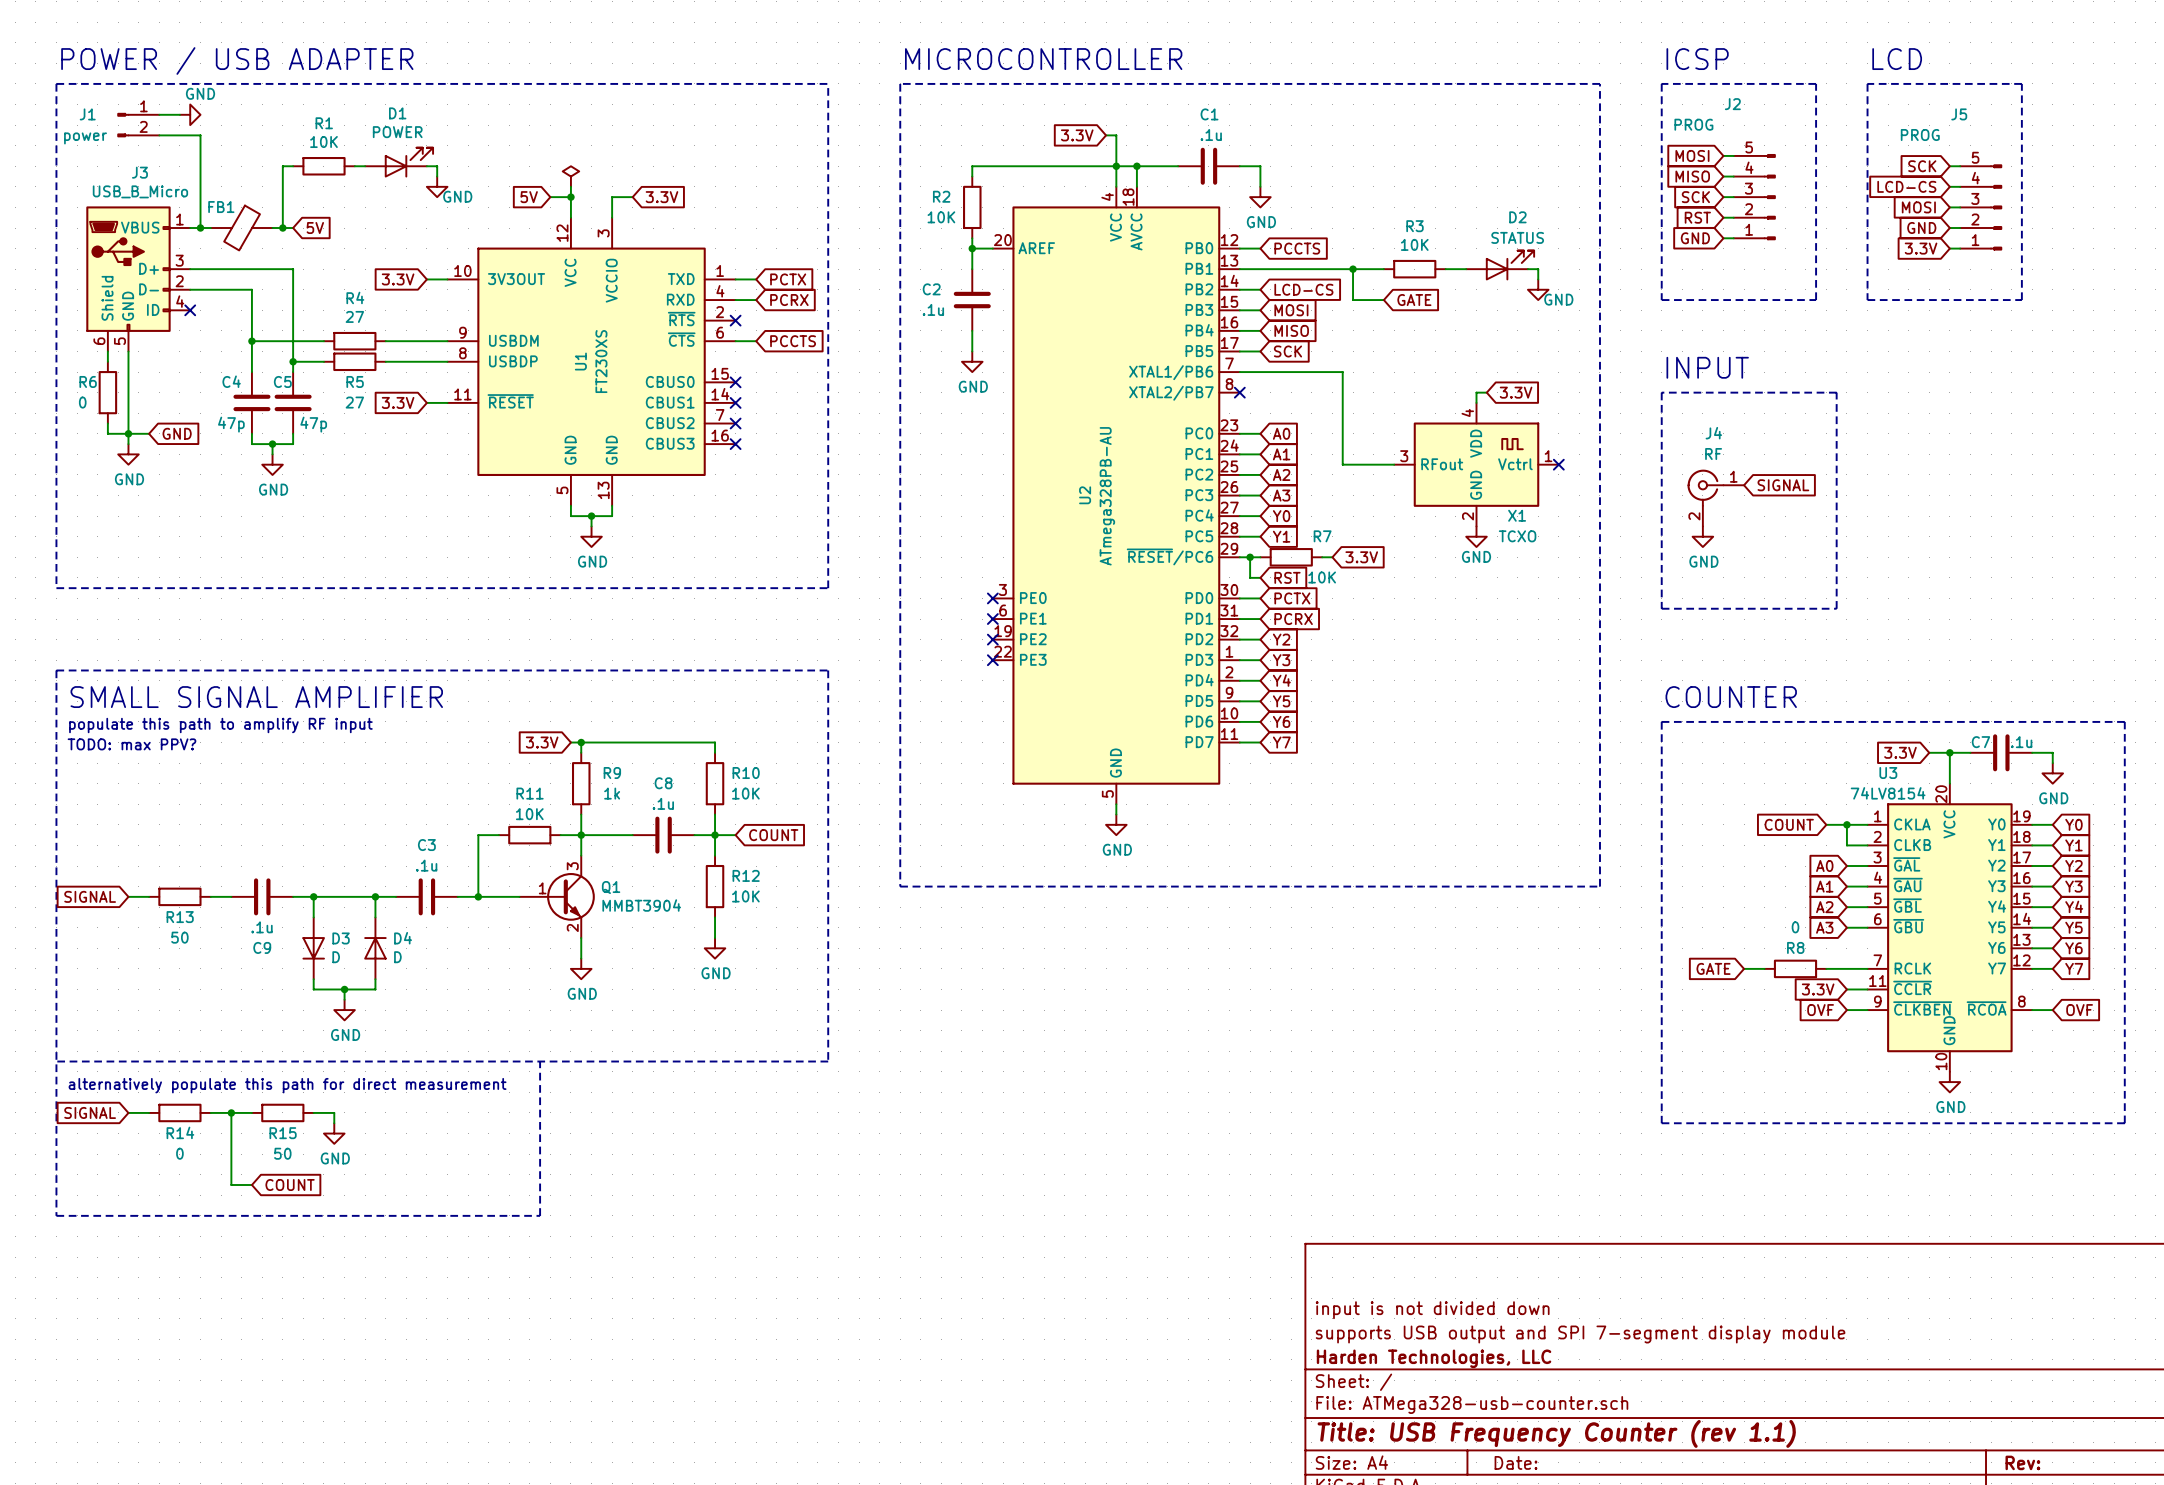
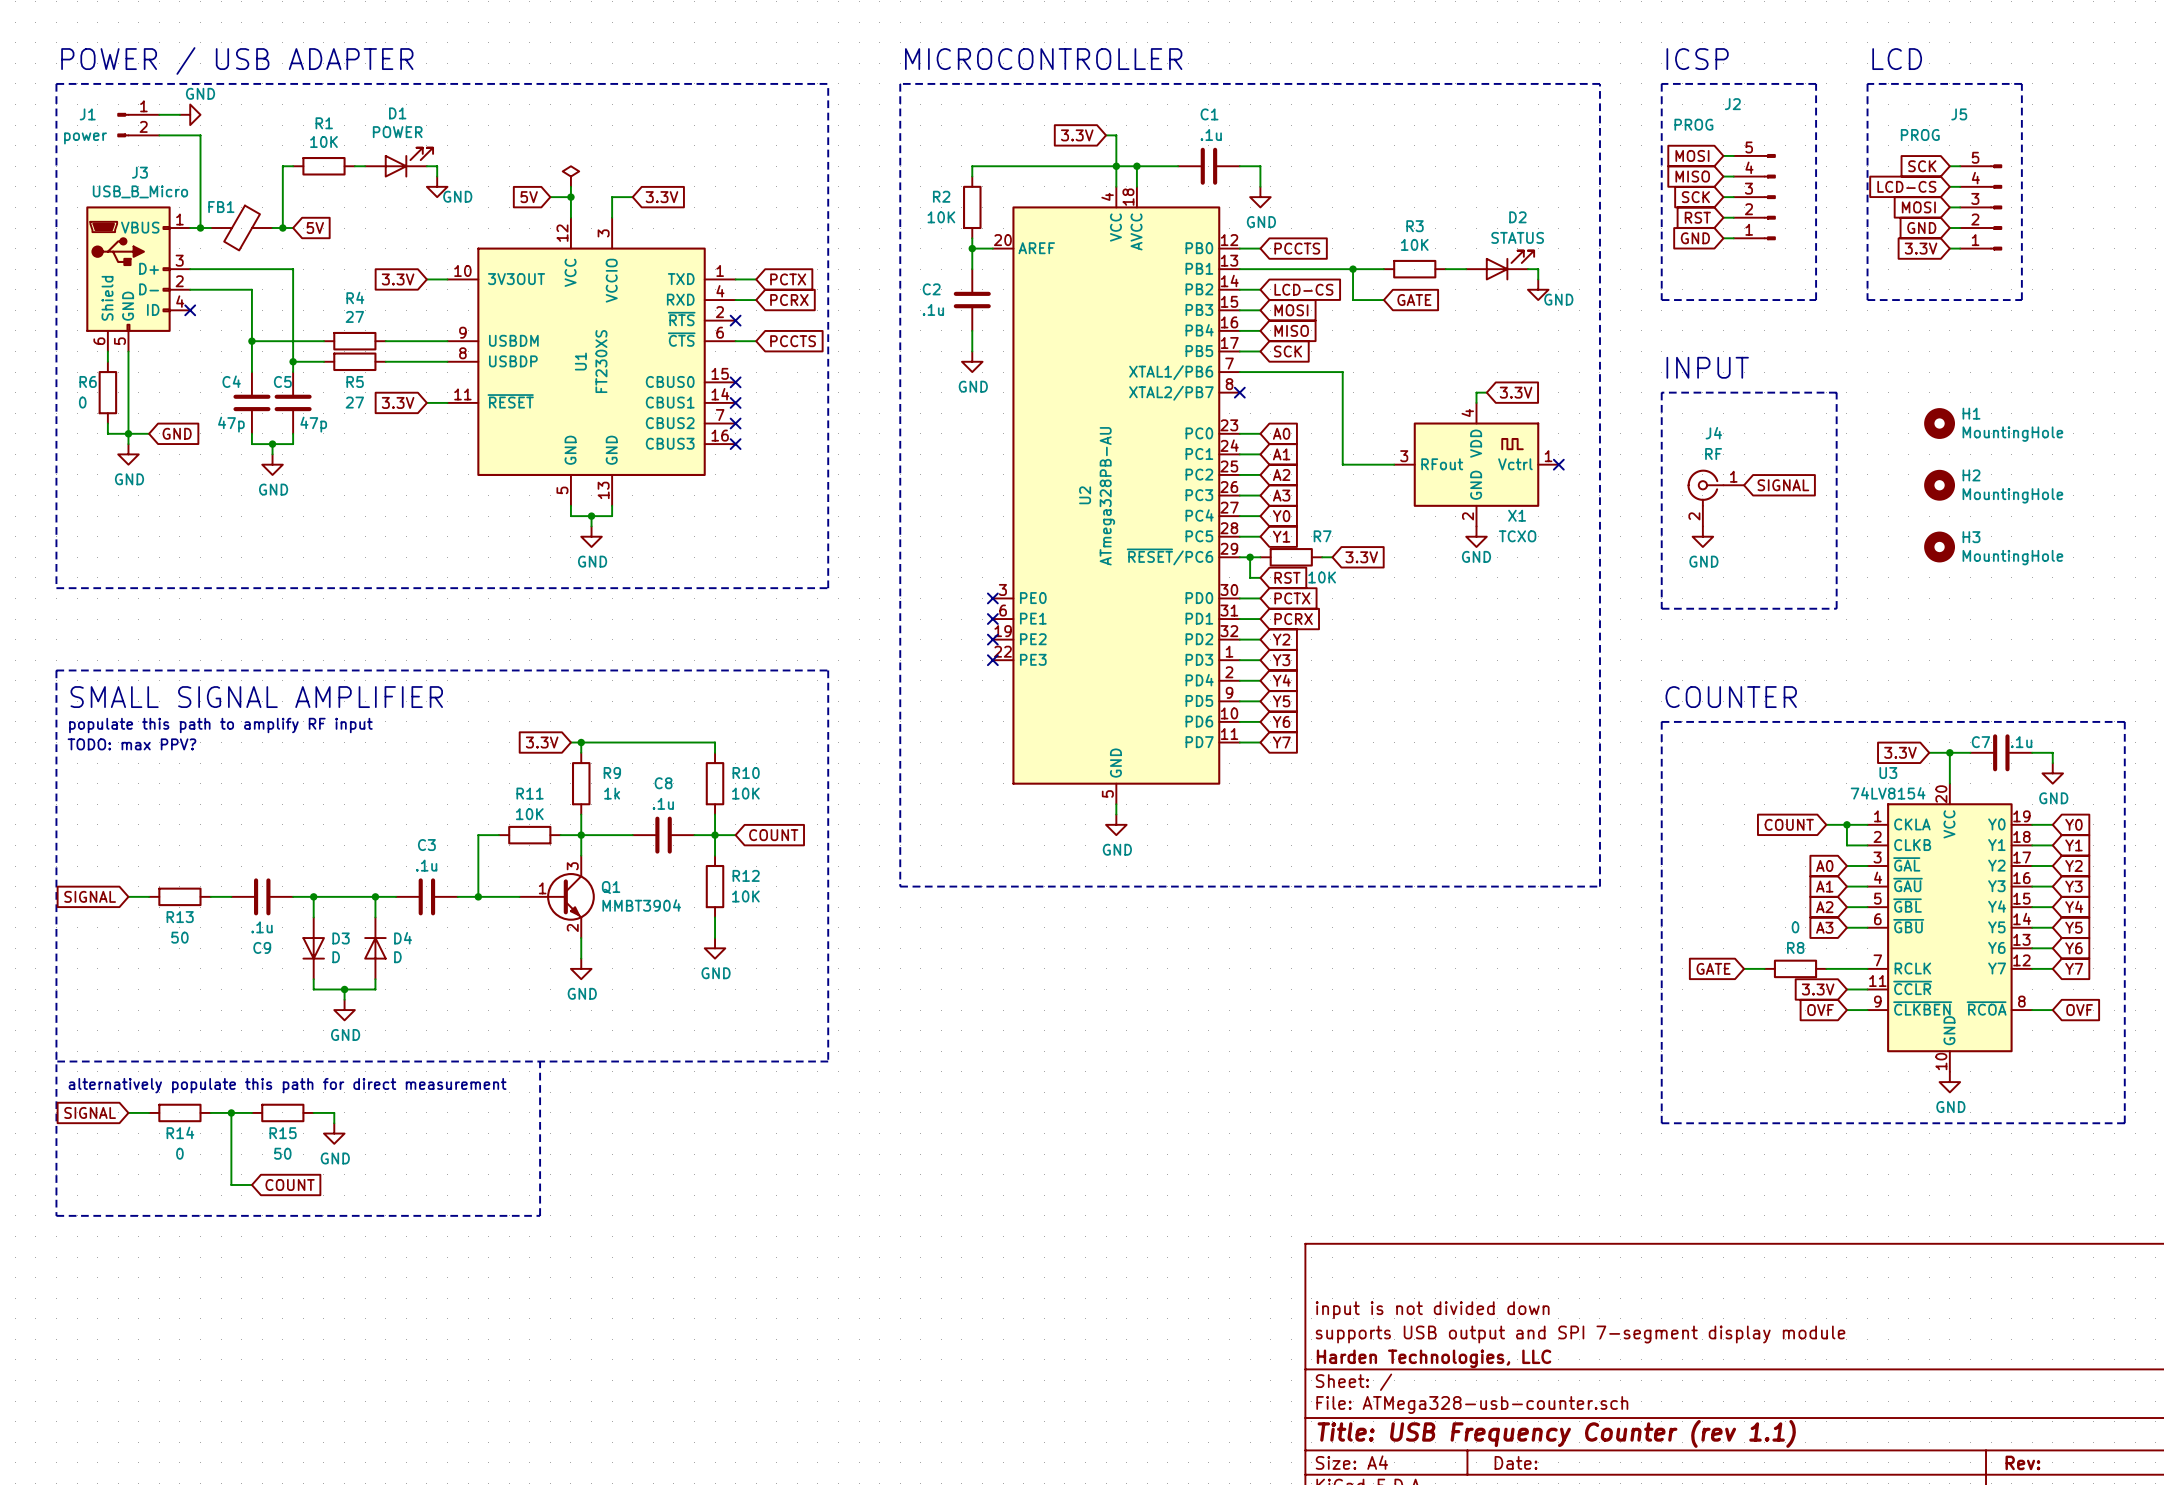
H1: none -> MountingHole (1939, 423)
H2: none -> MountingHole (1939, 485)
H3: none -> MountingHole (1939, 547)

